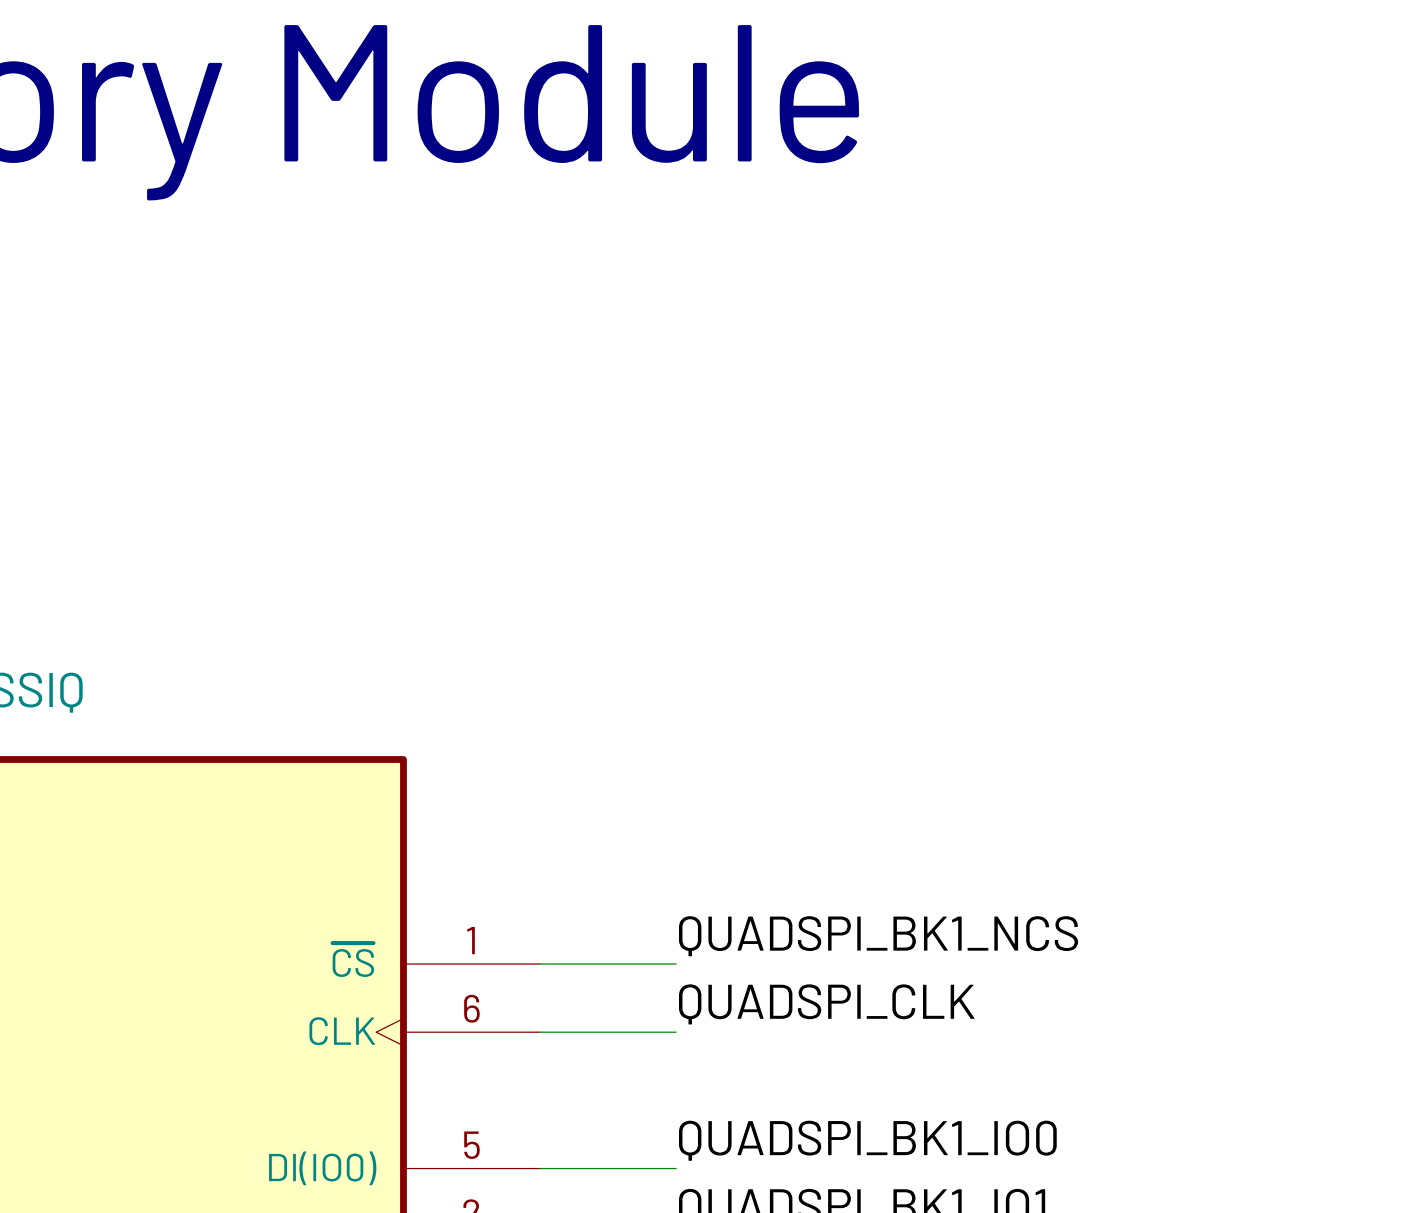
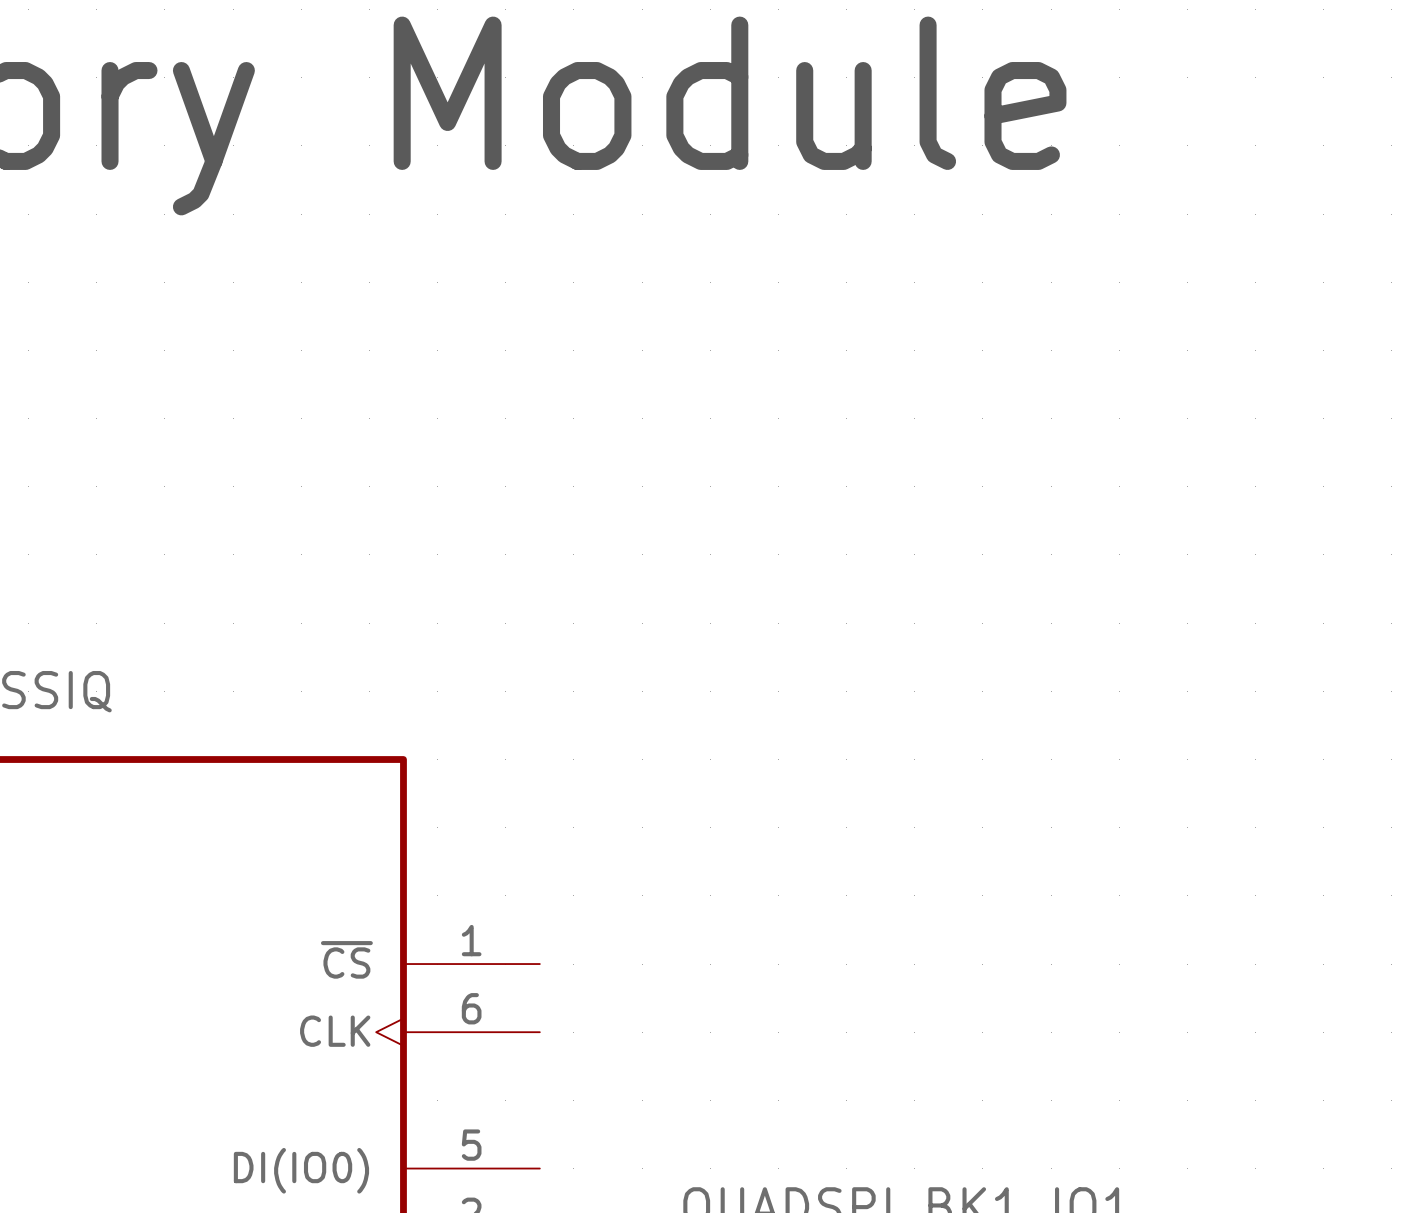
label: QUADSPI_BK1_NCS (878, 936) -> none
wire: (539, 964) (676, 964) -> none
label: QUADSPI_CLK (826, 1004) -> none
wire: (539, 1032) (676, 1032) -> none
label: QUADSPI_BK1_IO0 (867, 1140) -> none
wire: (539, 1168) (676, 1168) -> none

